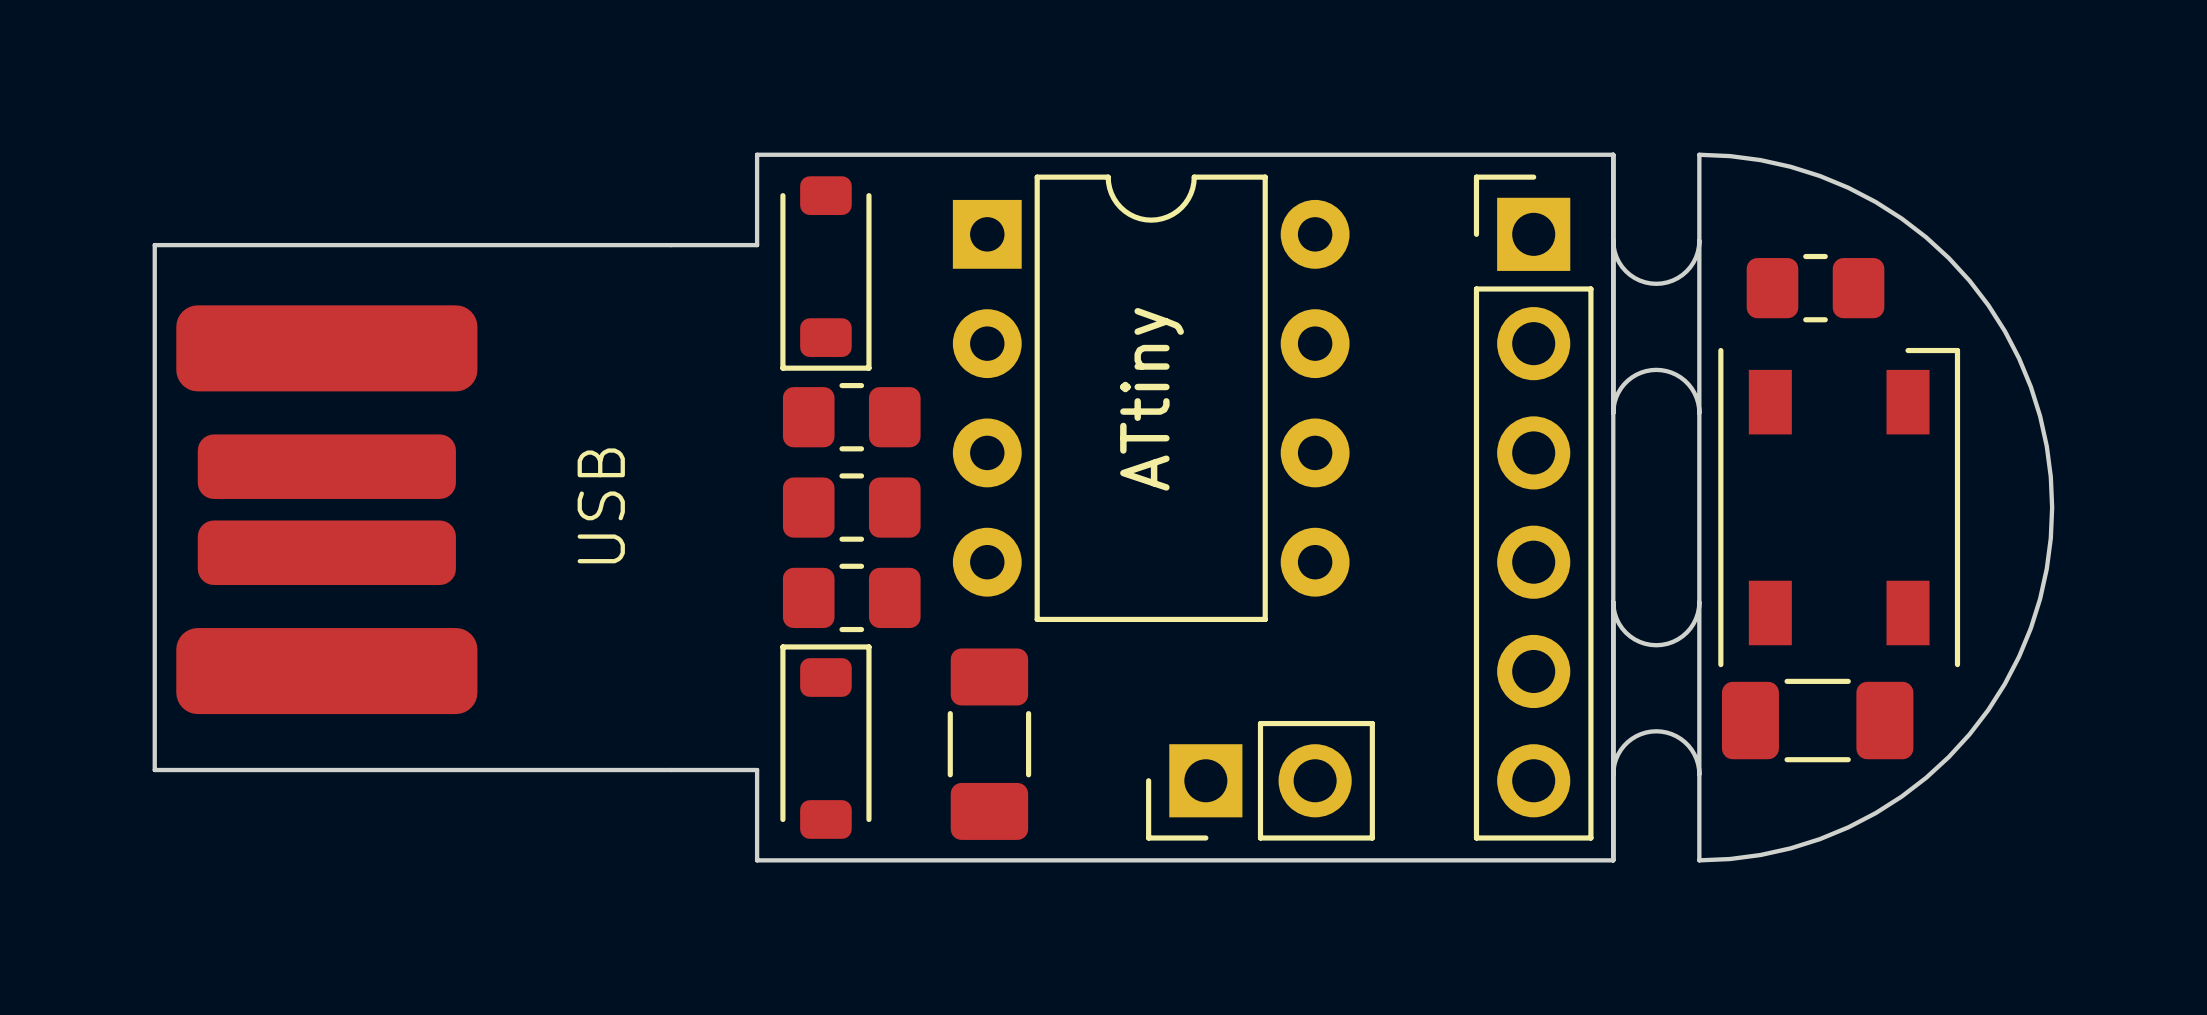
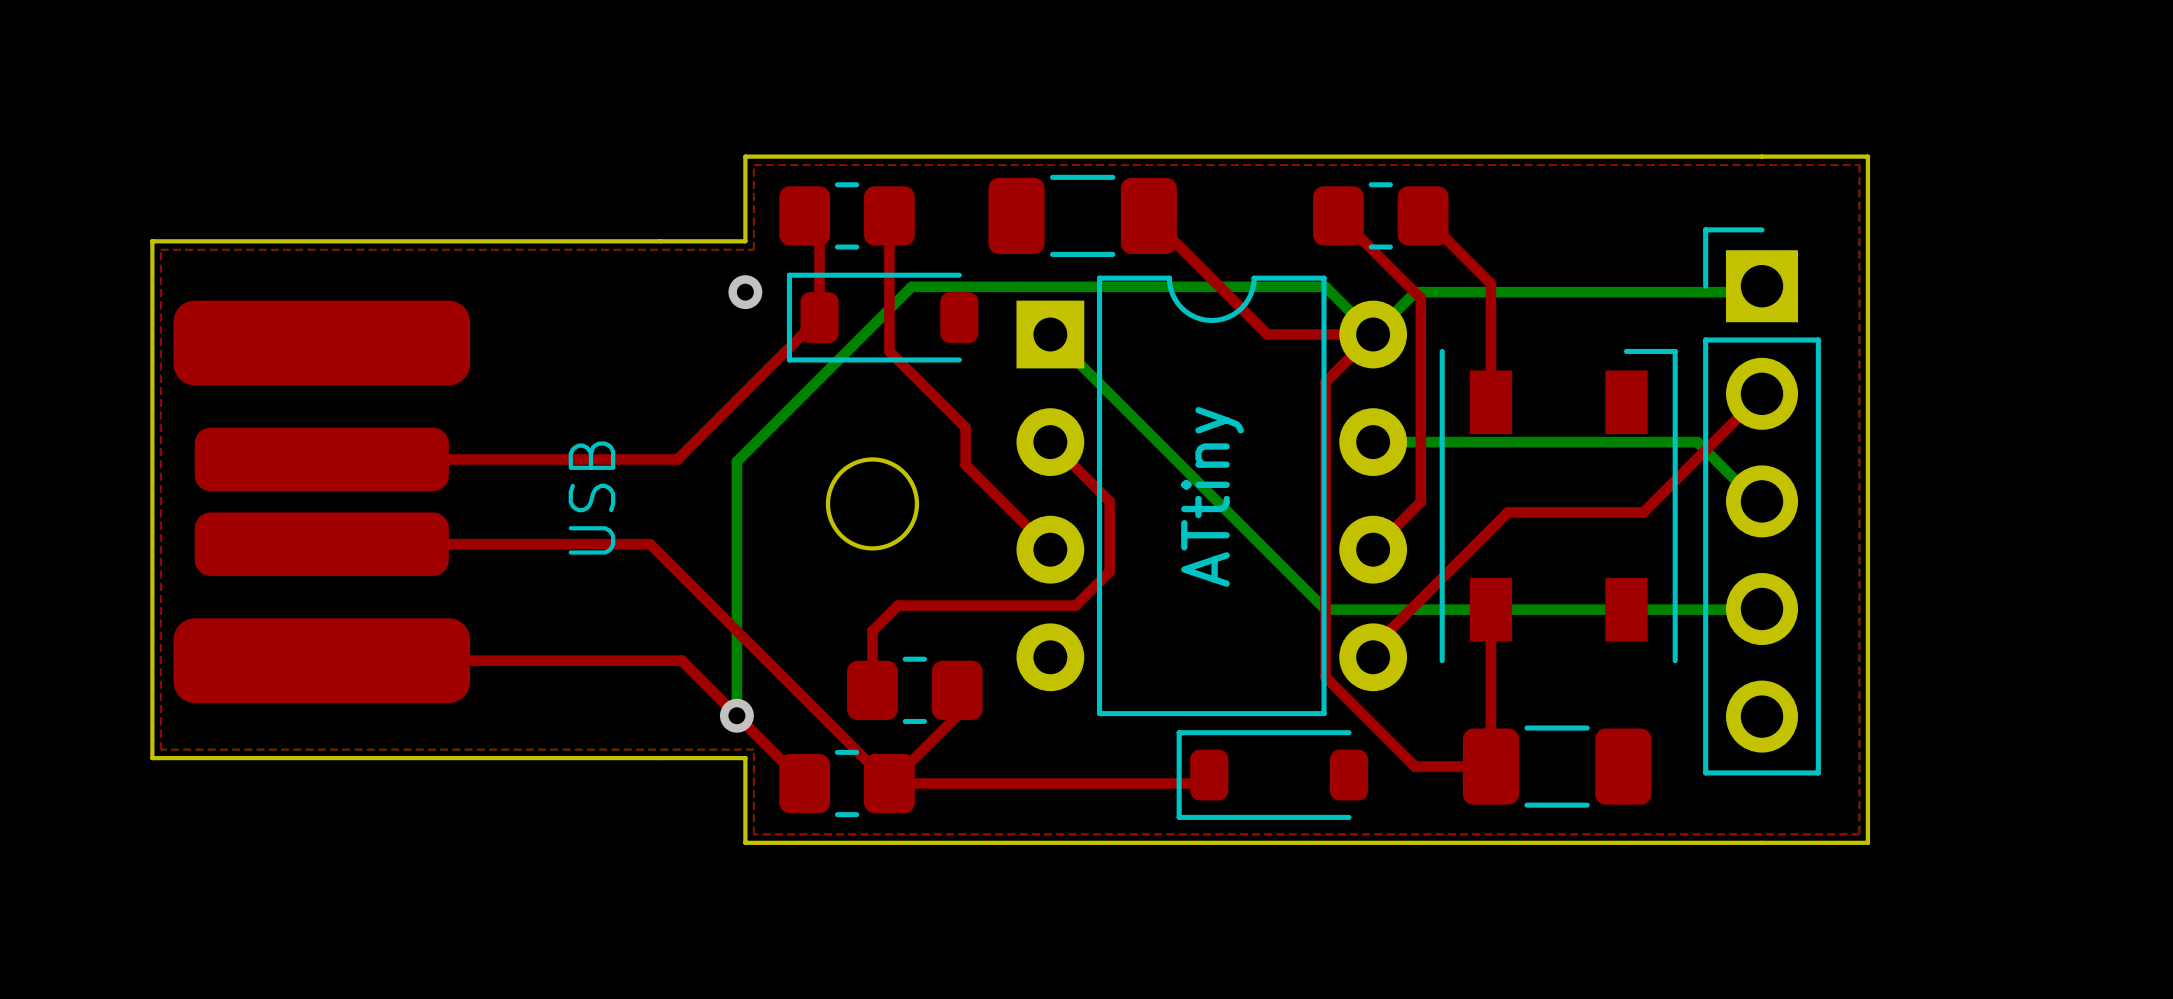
board edge: (1699, 154) (1699, 860) (1760, 855) (1790, 848) (1848, 827) (1901, 796) (1948, 757) (1988, 709) (2004, 683) (2030, 628) (2046, 568) (2052, 507) (2046, 446) (2030, 386) (2004, 331) (1988, 305) (1948, 258) (1901, 218) (1848, 187) (1790, 166) (1730, 156) (1699, 154) -> none
board edge: (757, 159) (757, 154) (1613, 154) (1613, 860) (757, 860) (757, 856) -> (745, 156) (1867, 156) (1867, 842) (745, 842)
top zone outline: none -> (753, 165) (753, 249) (160, 249) (160, 749) (753, 749) (753, 834) (1859, 834) (1859, 165) (753, 165)
top track: none -> (804, 215) (819, 230) (819, 317) (677, 459) (321, 459)
part: none -> (847, 215)
top track: none -> (889, 215) (889, 351) (965, 427) (965, 464) (1050, 549)
part: none -> (1082, 215)
top track: none -> (1148, 215) (1267, 334) (1373, 334) (1325, 382) (1325, 677) (1415, 766) (1490, 766) (1490, 609)
top track: none -> (1338, 215) (1420, 298) (1420, 502) (1373, 549)
part: none -> (1380, 215)
top track: none -> (1423, 215) (1490, 283) (1490, 402)
board edge: (1613, 240) (1616, 257) (1625, 271) (1639, 280) (1656, 283) (1672, 280) (1686, 271) (1696, 257) (1699, 240) -> none
part rotation: 0° (825, 273) -> 90° clockwise (882, 317)
part: (1815, 288) -> none
bottom track: none -> (1756, 286) (1756, 292) (1414, 292)
via: none -> (745, 292)
bottom track: none -> (1414, 292) (1373, 334) (1325, 286) (911, 286) (736, 461) (736, 715)
bottom track: none -> (1050, 334) (1325, 609) (1756, 609)
part position: (1151, 398) -> (1211, 495)
top track: none -> (1756, 393) (1756, 399) (1643, 512) (1507, 512) (1373, 647) (1373, 657)
board edge: (1613, 412) (1616, 397) (1624, 384) (1636, 374) (1656, 369) (1671, 372) (1684, 380) (1694, 392) (1699, 412) -> none
part: (851, 417) -> none
top track: none -> (1050, 442) (1109, 501) (1109, 571) (1075, 605) (897, 605) (872, 631) (872, 690)
bottom track: none -> (1373, 442) (1697, 442) (1756, 501)
round board edge: none -> [825, 457, 920, 551]
part: (851, 507) -> none
part: (1533, 507) -> none
part position: (1839, 507) -> (1558, 506)
part: none -> (1762, 501)
top track: none -> (321, 544) (650, 544) (889, 783)
part: (851, 597) -> none
board edge: (1613, 602) (1616, 618) (1625, 632) (1639, 641) (1656, 645) (1672, 641) (1686, 632) (1696, 618) (1699, 602) -> none
top track: none -> (321, 660) (681, 660) (804, 783)
part: none -> (914, 690)
top track: none -> (957, 690) (957, 715) (889, 783)
part footprint: [1146, 720, 1375, 841] -> [1176, 730, 1369, 820]
part position: (1817, 720) -> (1557, 766)
via: none -> (736, 715)
part: (825, 741) -> none
part: (989, 744) -> none
board edge: (1613, 774) (1618, 754) (1627, 742) (1641, 734) (1656, 731) (1671, 734) (1684, 742) (1694, 754) (1699, 774) -> none
top track: none -> (1209, 775) (1200, 783) (889, 783)
part: none -> (847, 783)

